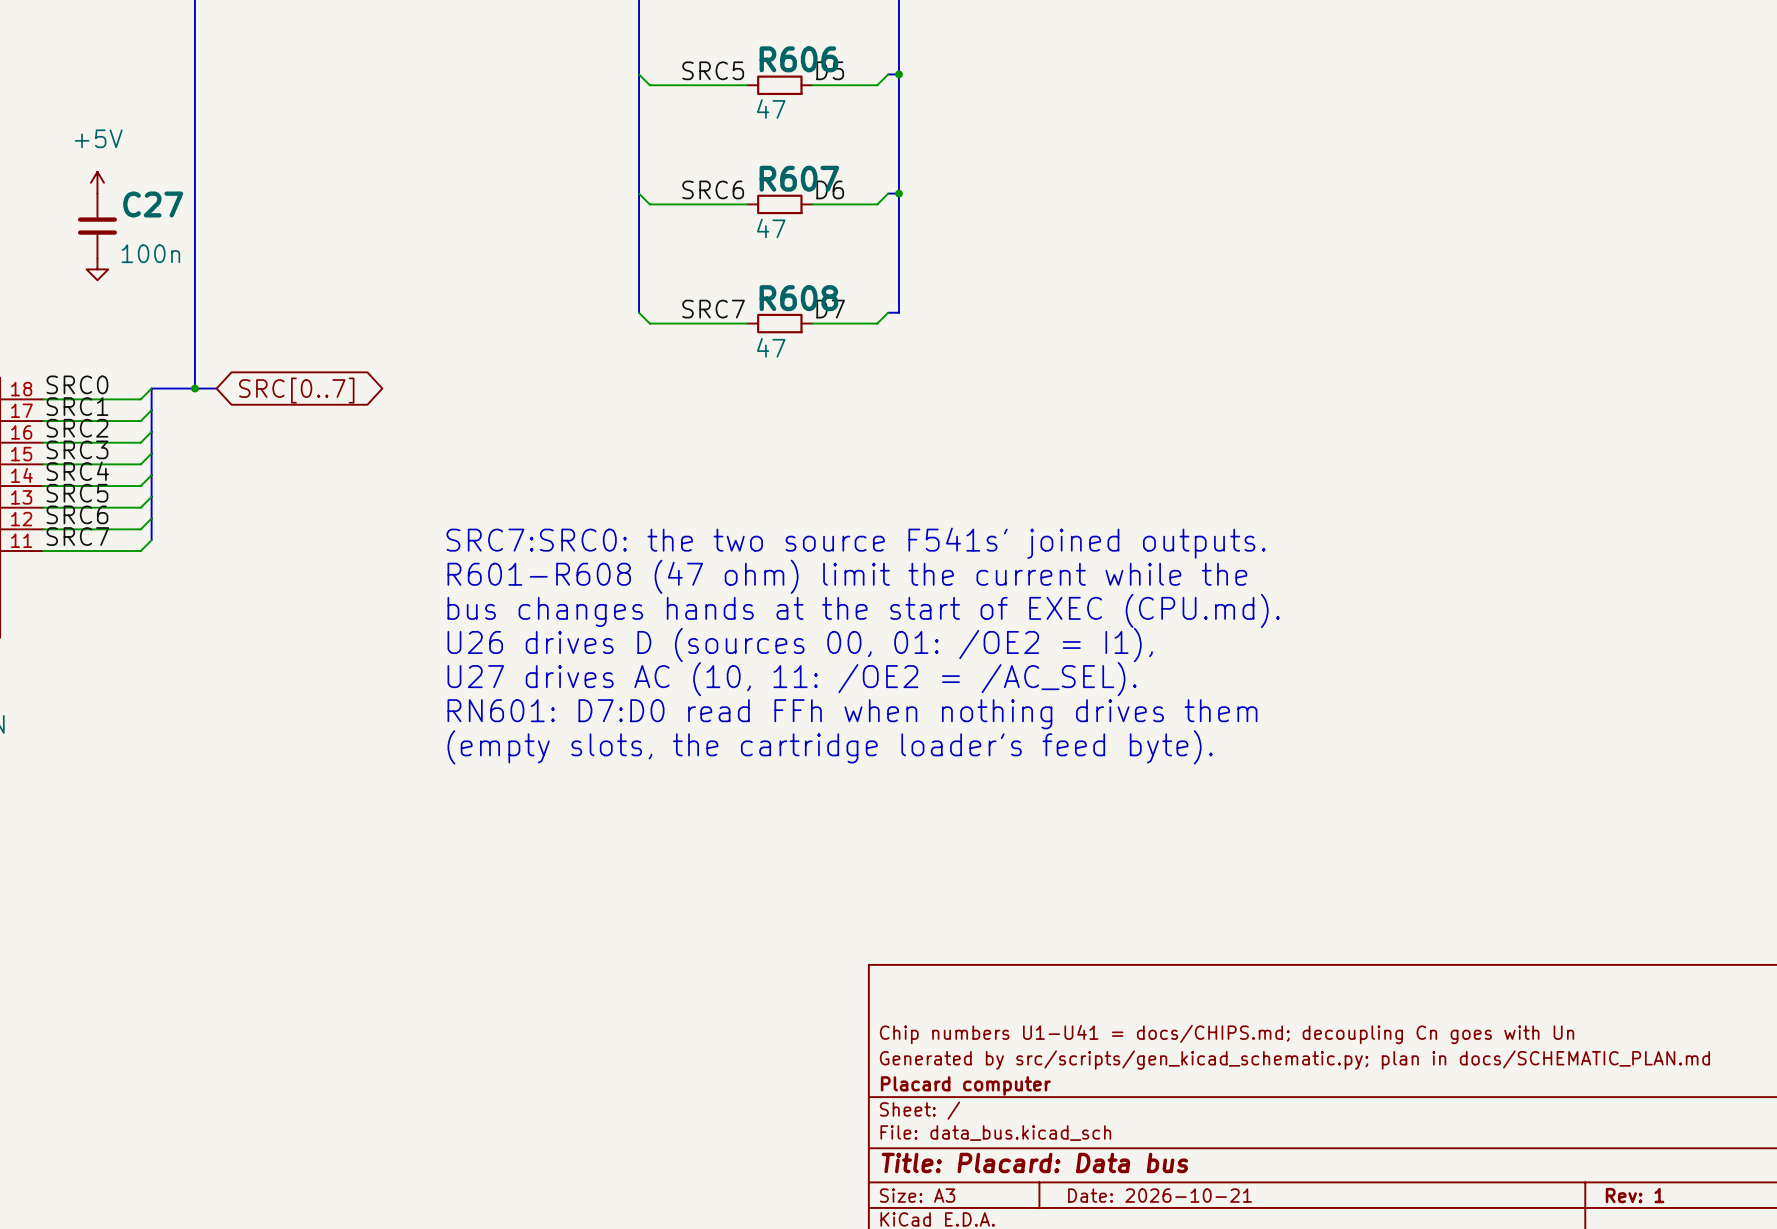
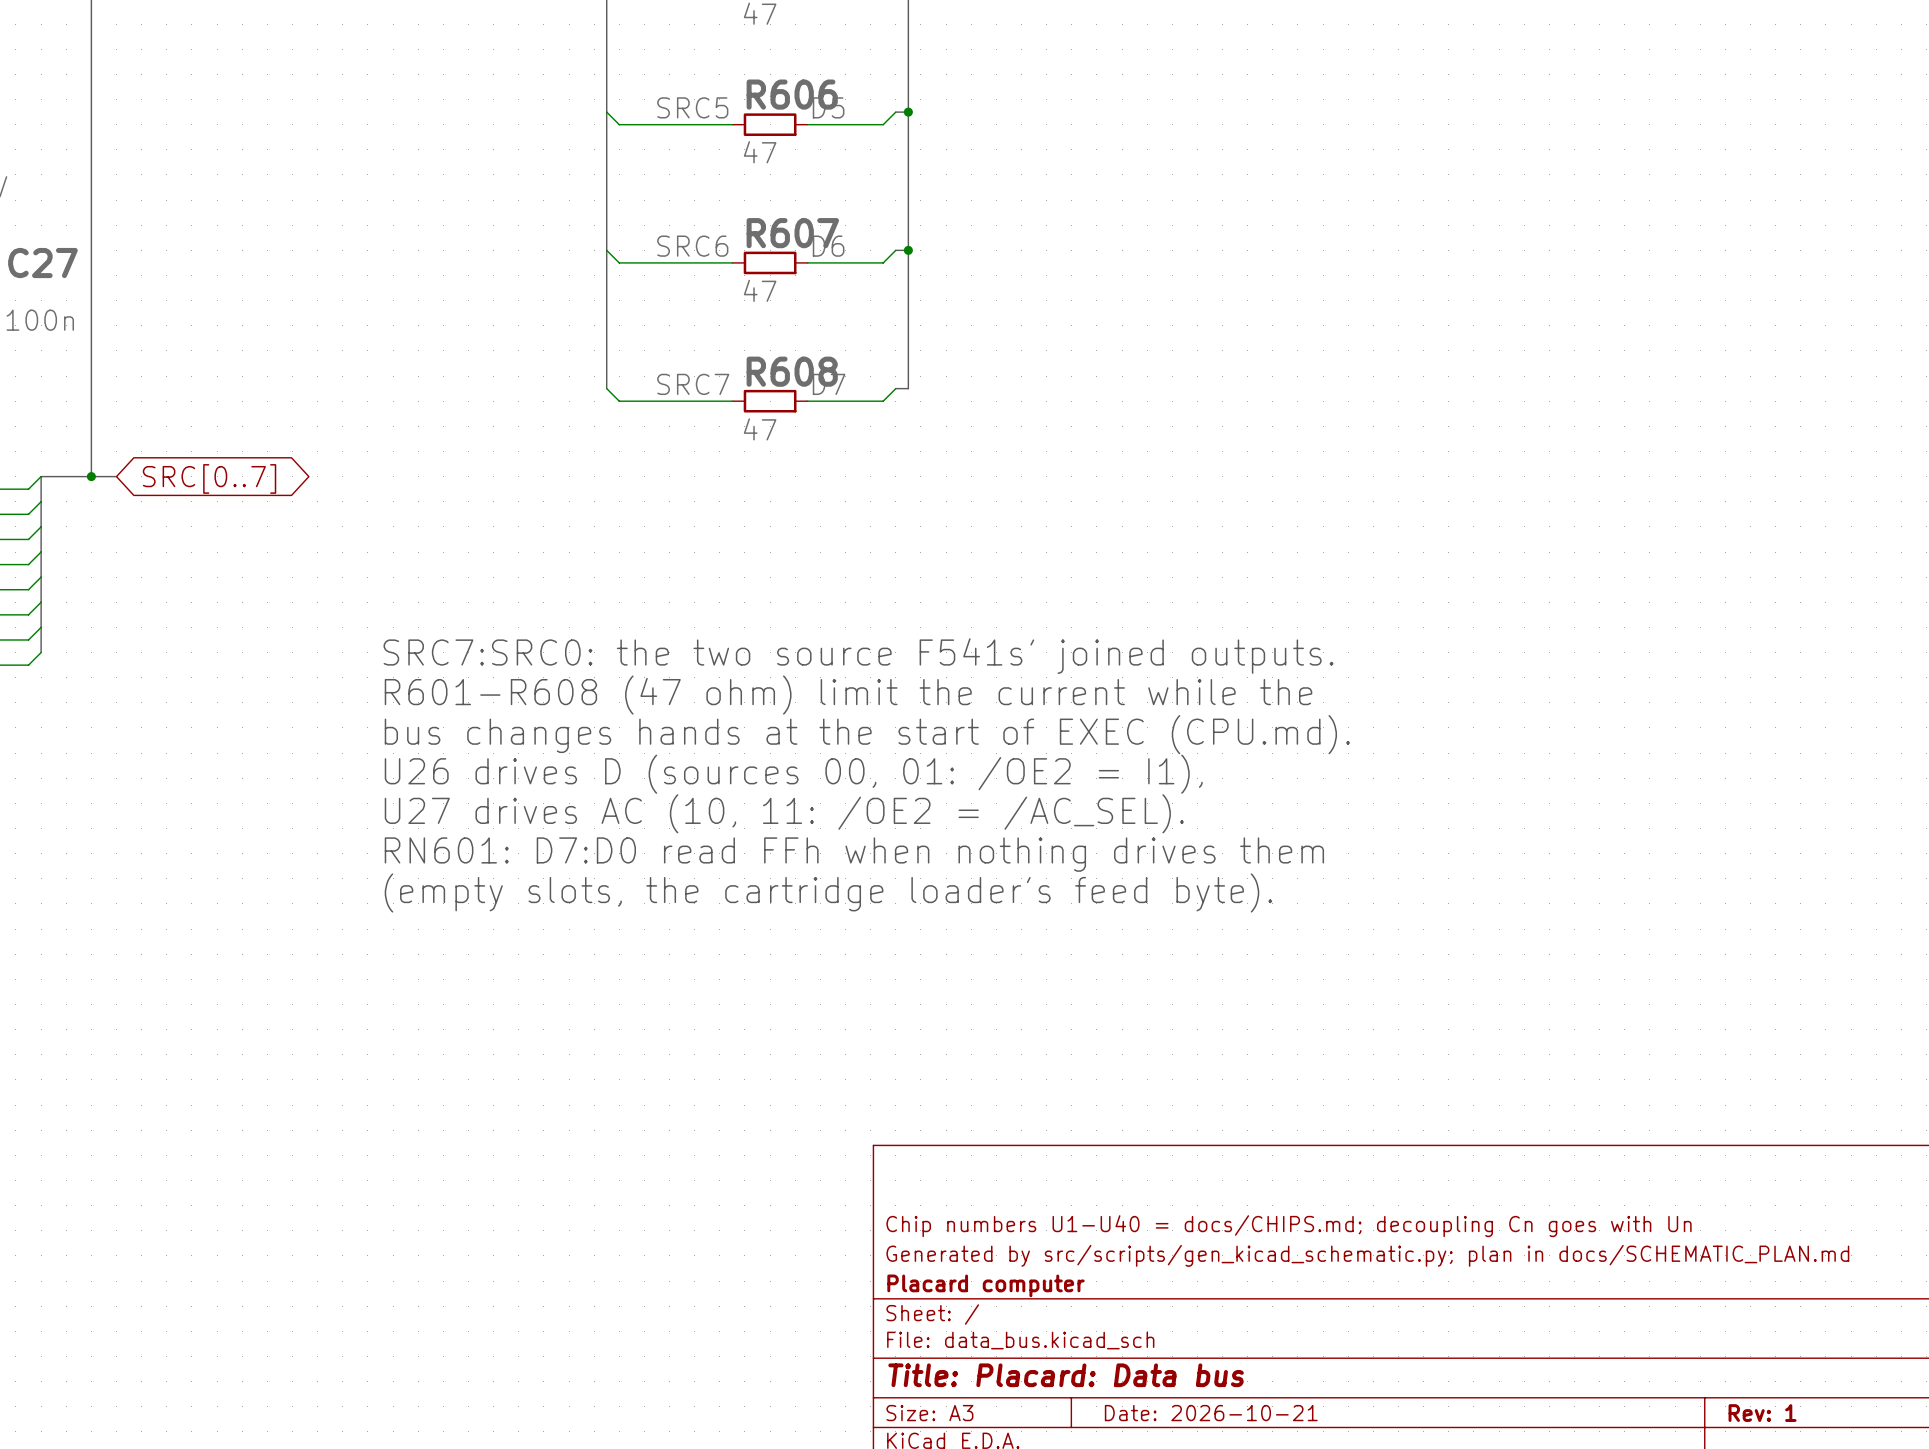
title block: Chip numbers U1-U41 = docs/CHIPS.md; decoupling Cn goes with Un (1227, 1034) -> Chip numbers U1-U40 = docs/CHIPS.md; decoupling Cn goes with Un (1289, 1226)

